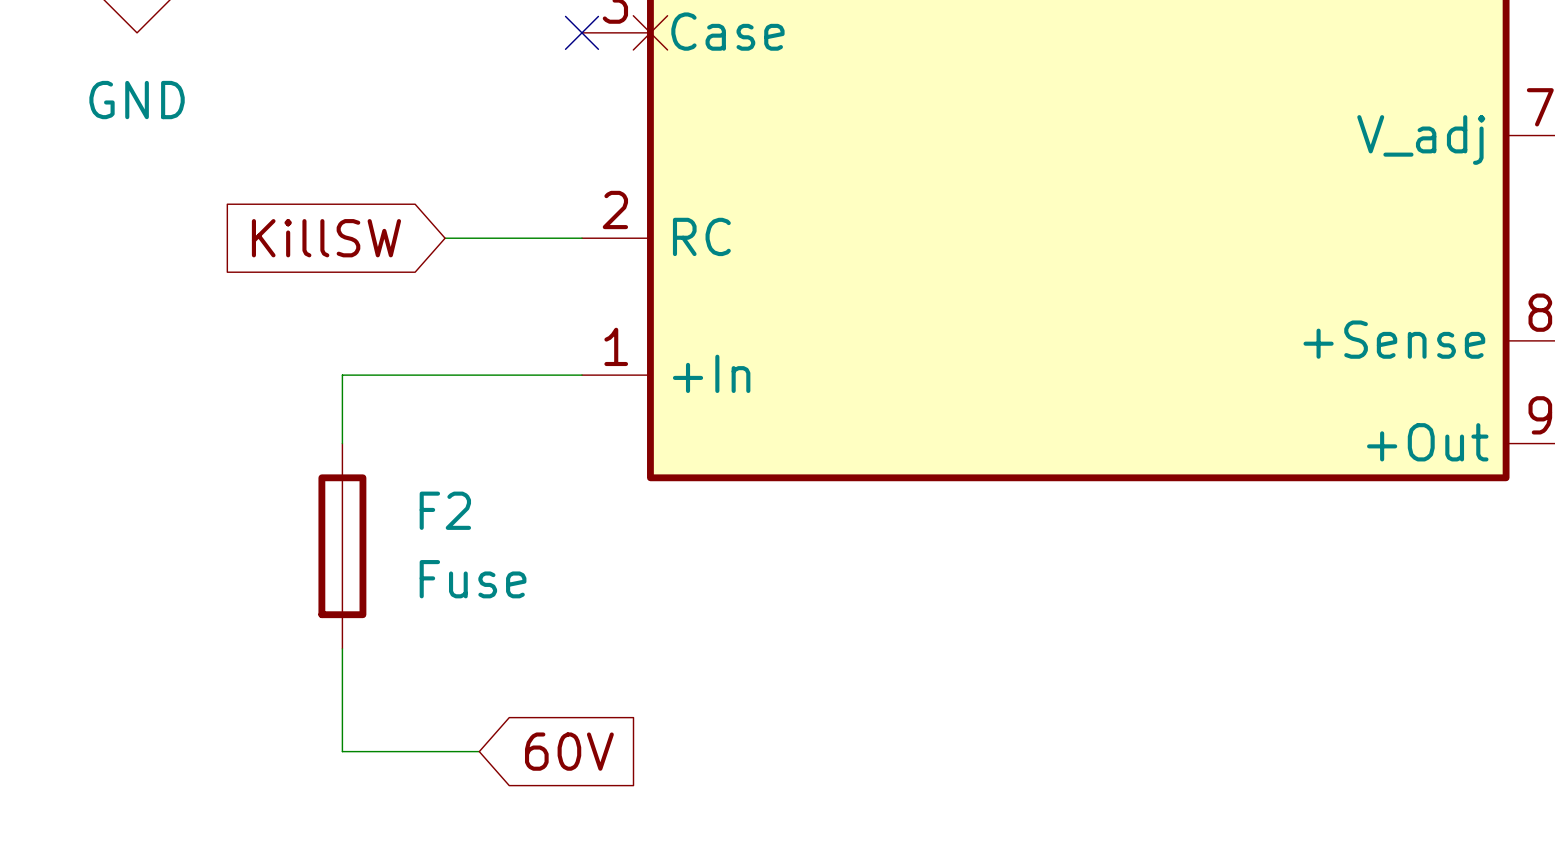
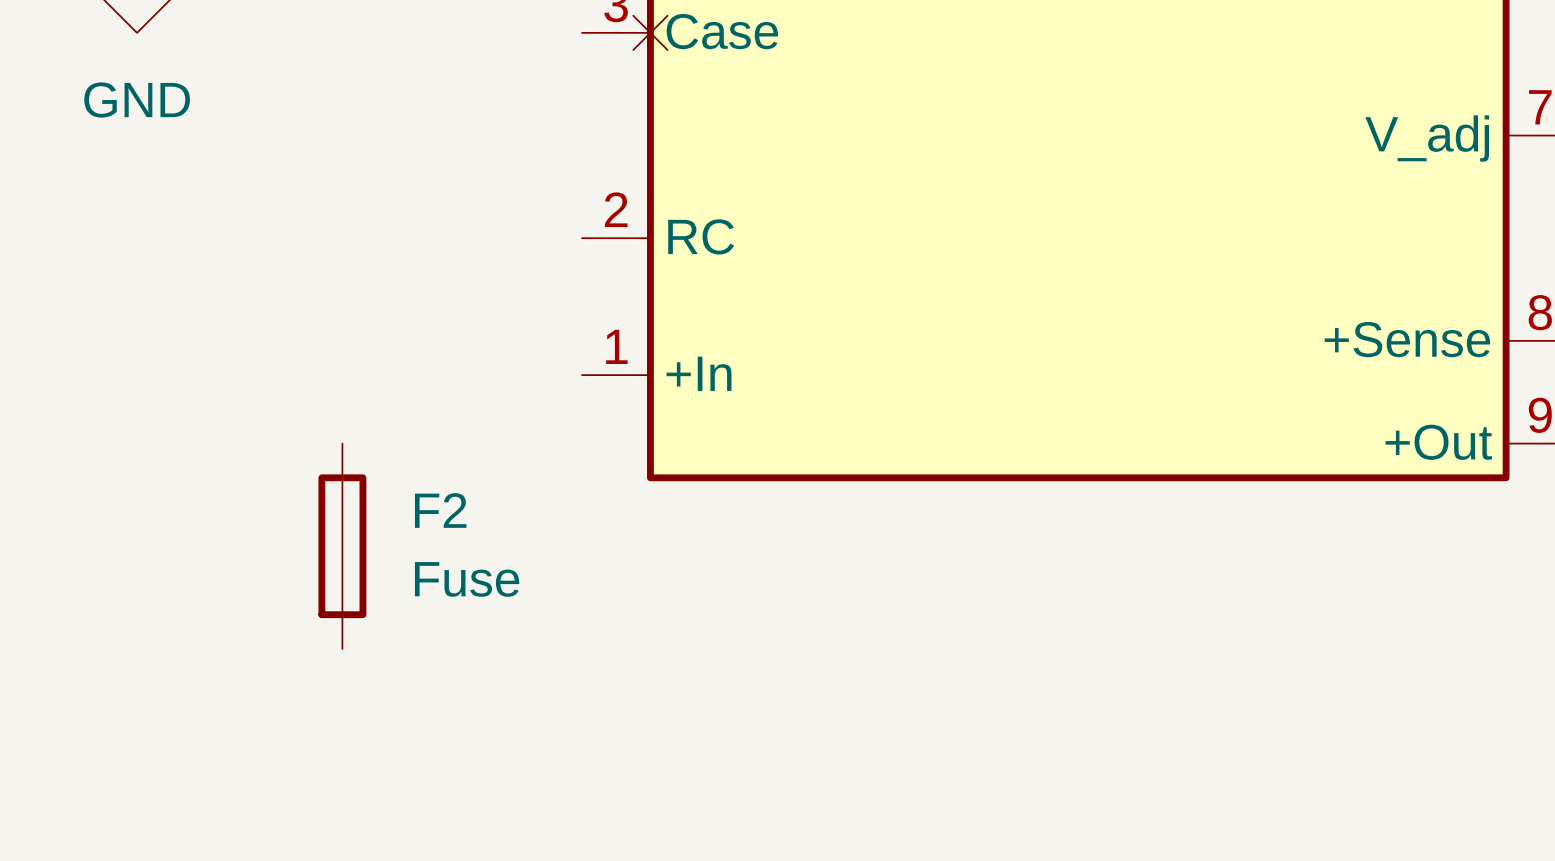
no-connect mark: (581, 32) -> none
global label: KillSW (326, 238) -> none
wire: (445, 238) (581, 238) -> none
wire: (581, 375) (342, 375) (342, 443) -> none
wire: (342, 648) (342, 751) (479, 751) -> none
global label: 60V (569, 751) -> none

